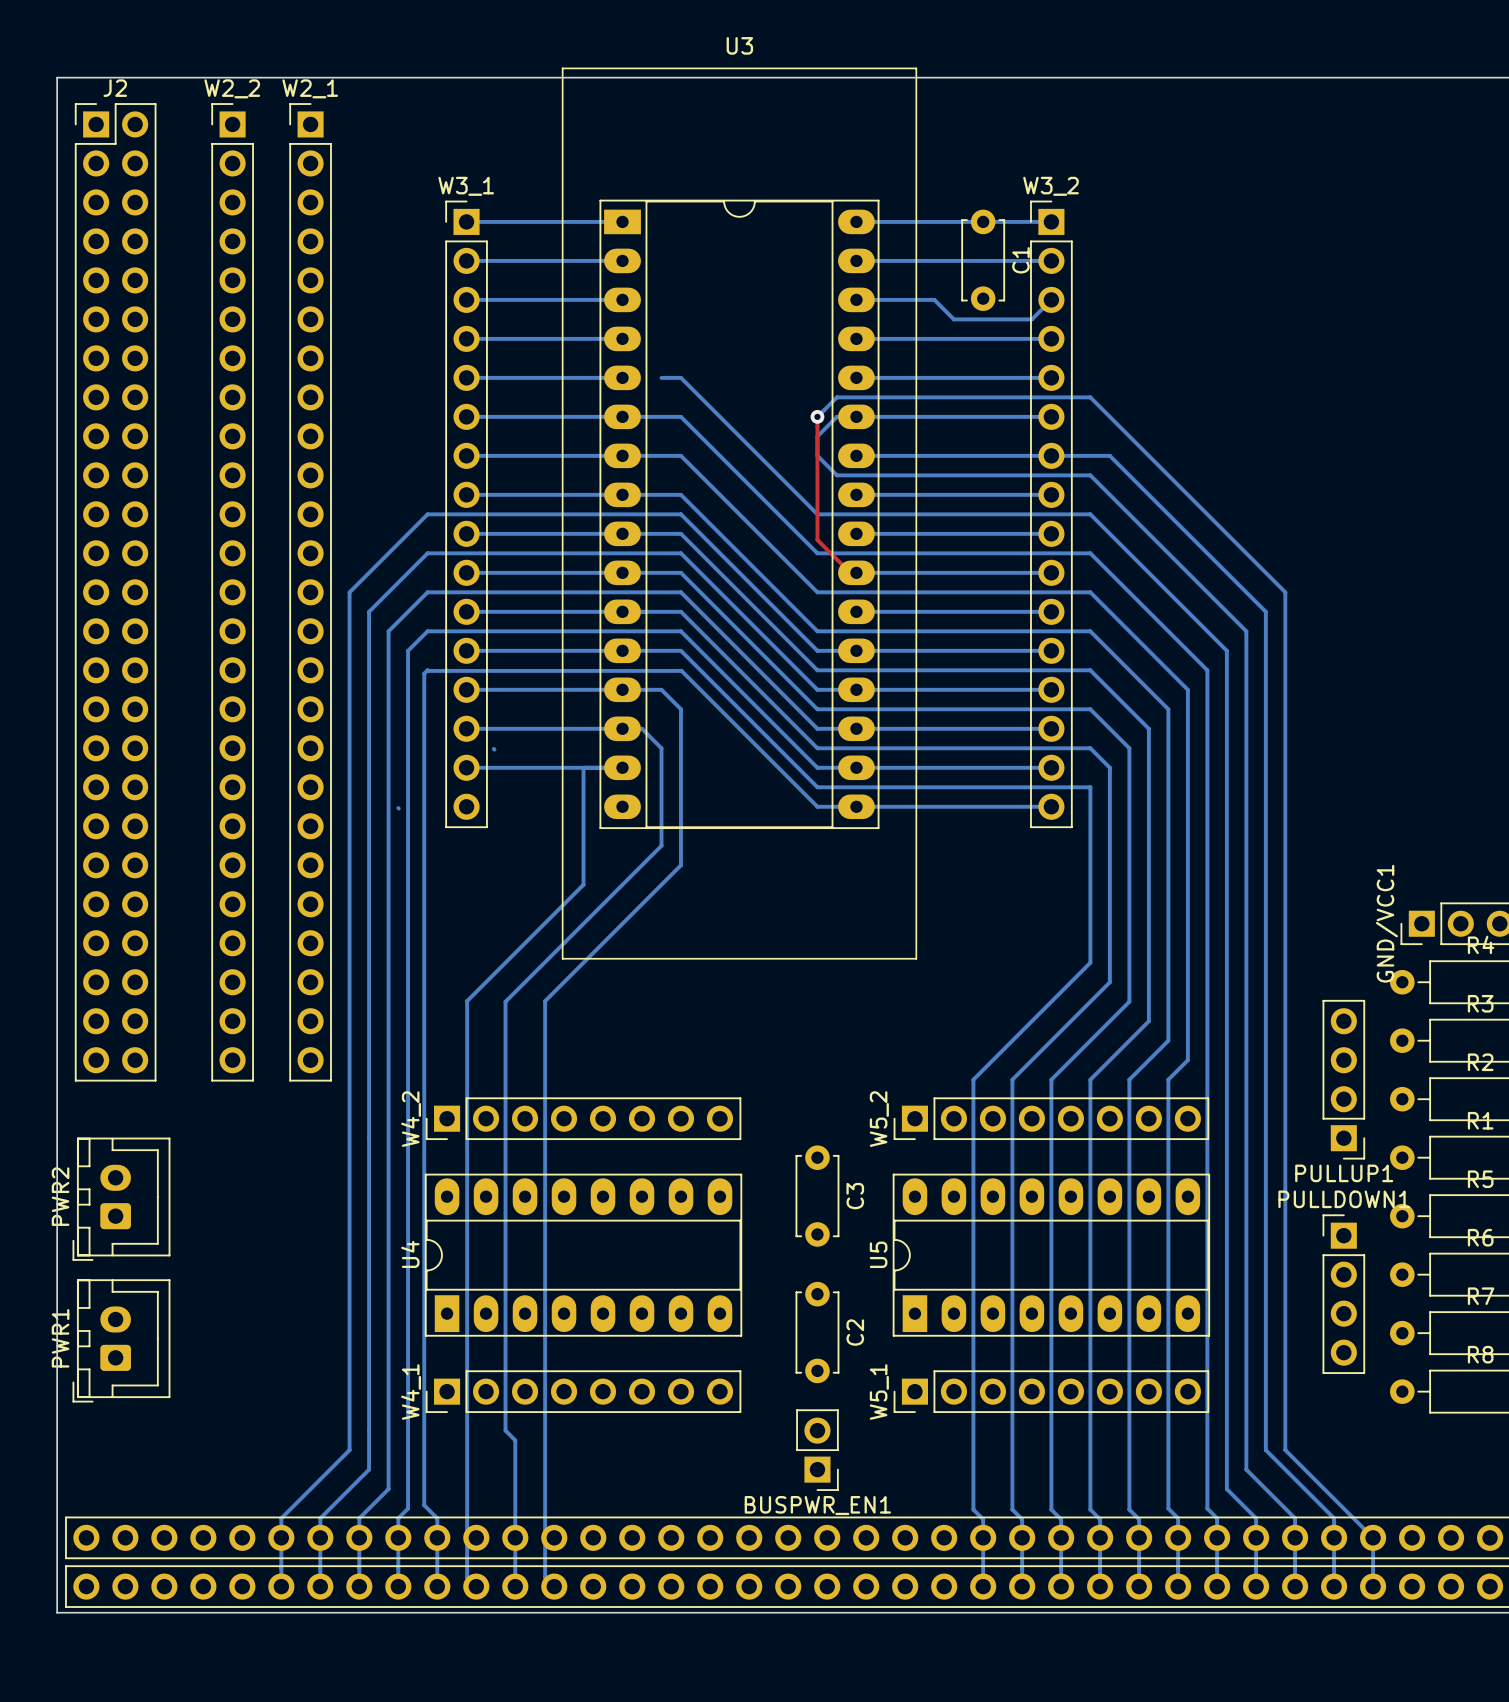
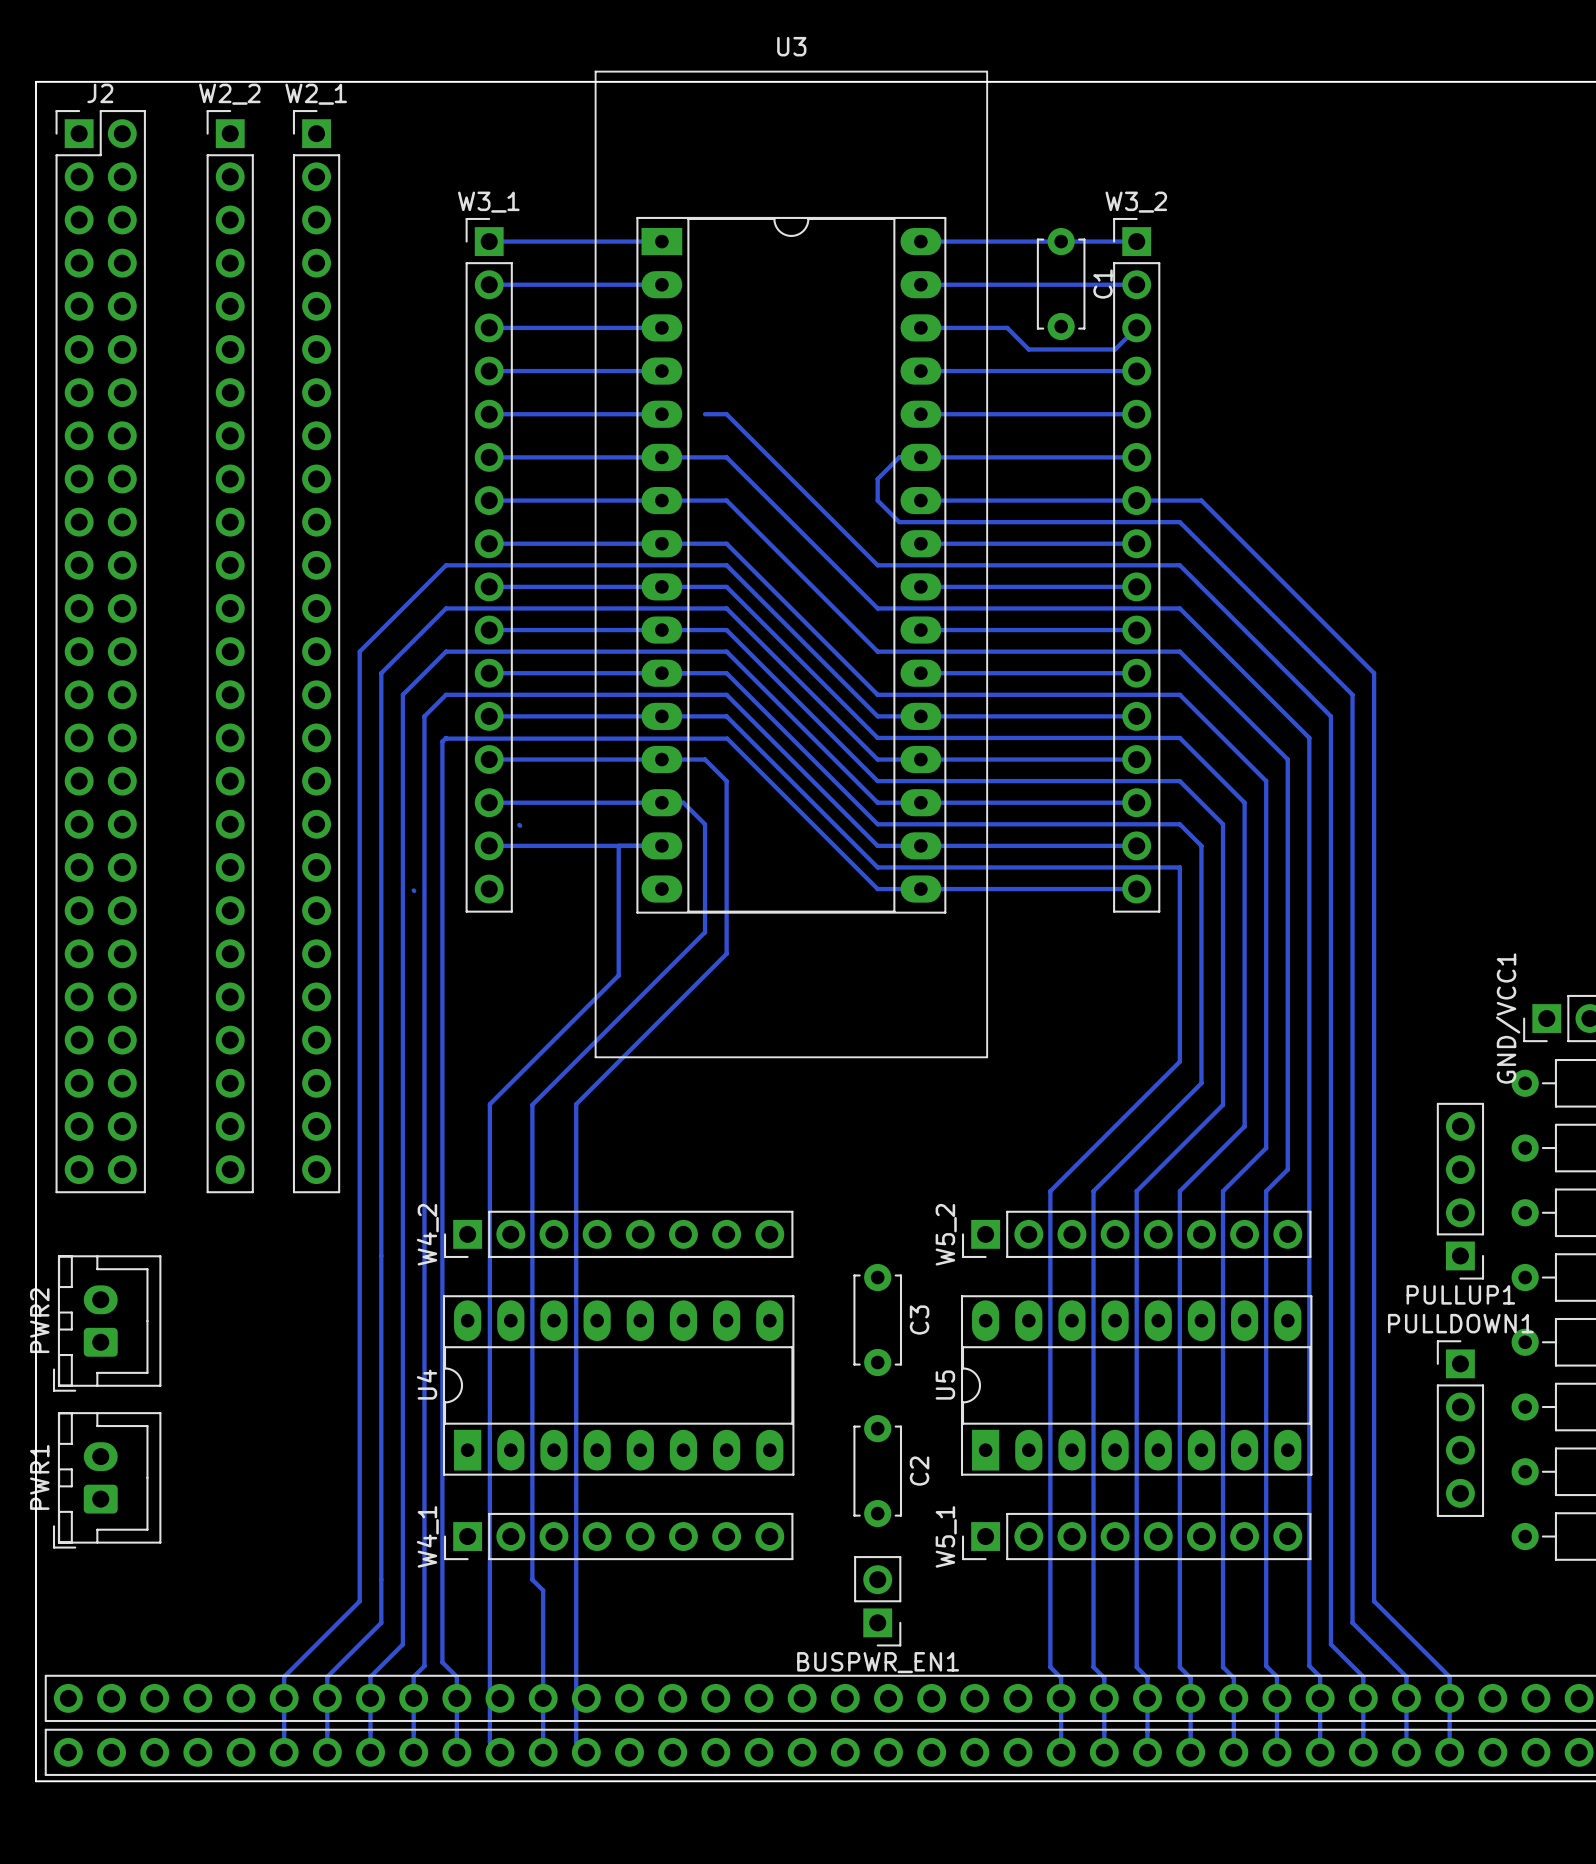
bottom track: (817, 416) (836, 397) (1090, 397) (1285, 592) (1285, 1450) (1373, 1537) (1373, 1586) -> none
top track: (817, 416) (817, 539) (850, 572) (856, 572) -> none
via: (817, 416) -> none

